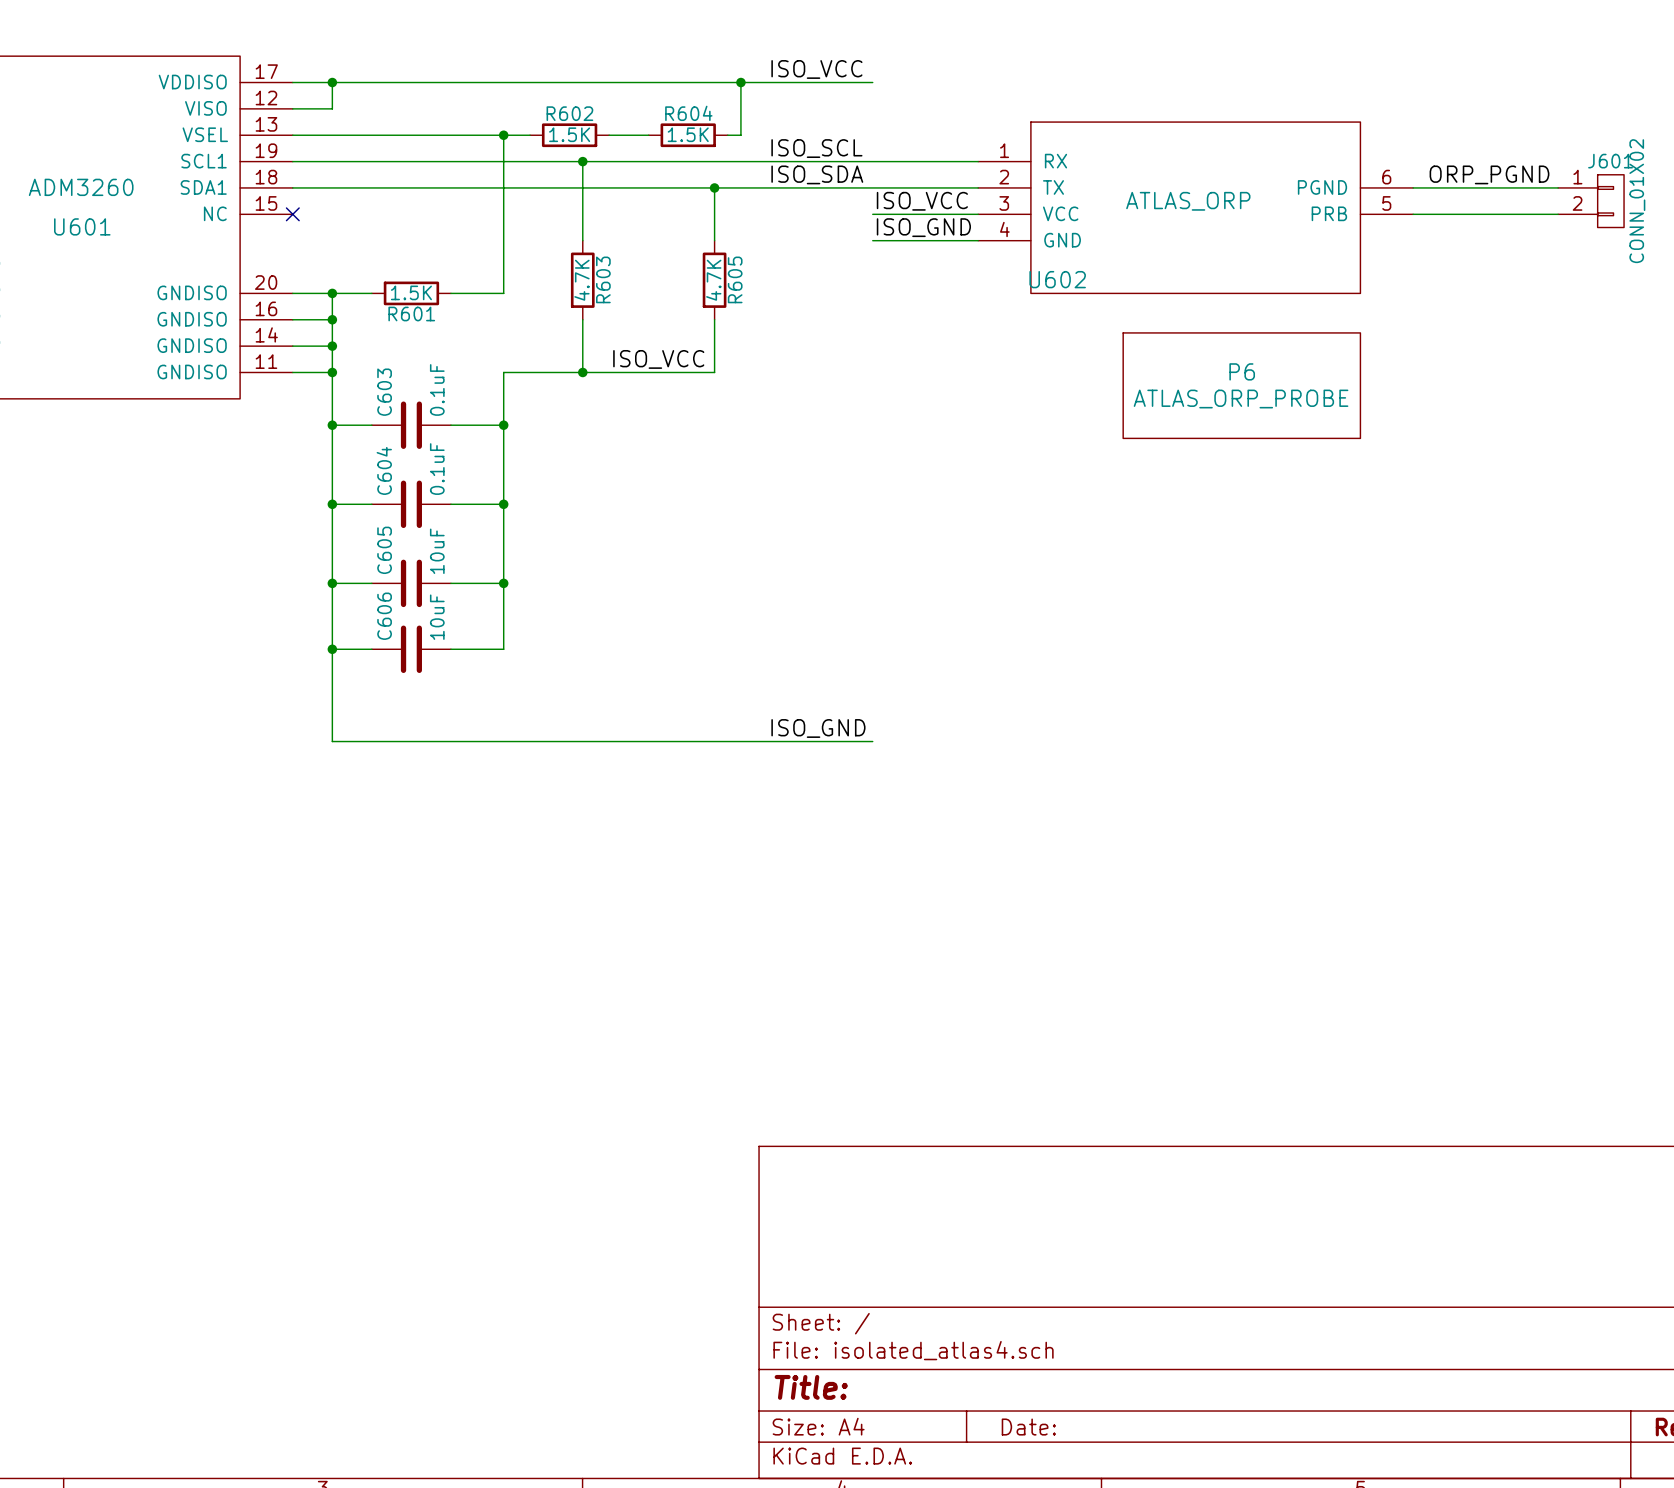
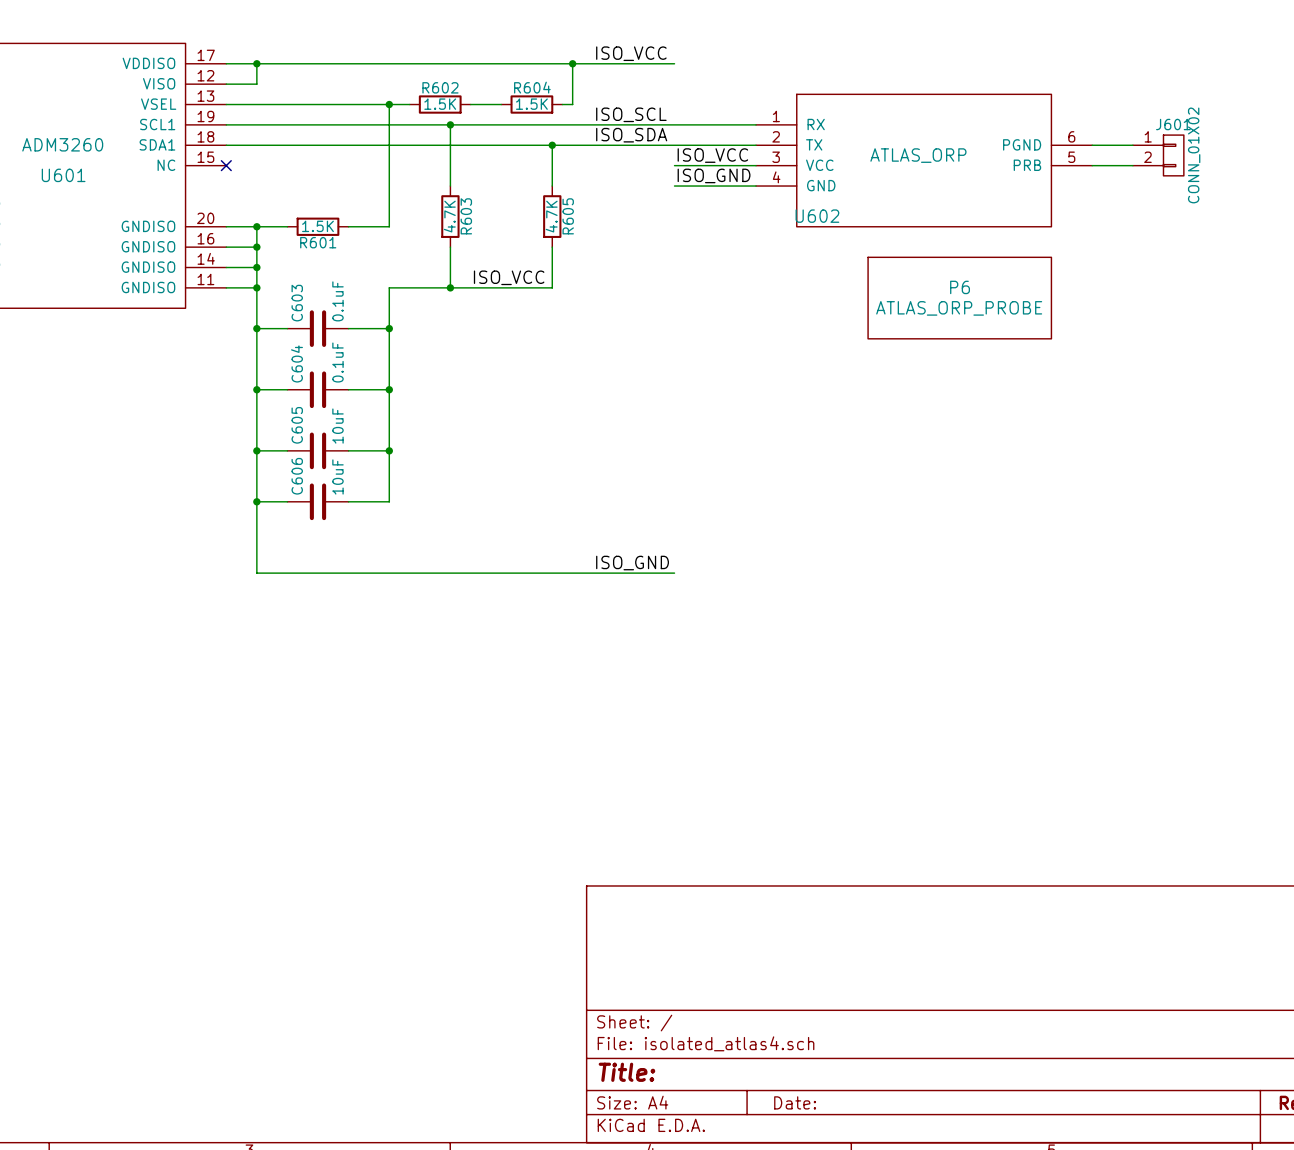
label: ORP_PGND (1489, 174) -> none
wire: (1465, 187) (1558, 187) -> none
J601 position: (1591, 201) -> (1158, 155)
wire: (1465, 214) (1558, 214) -> none

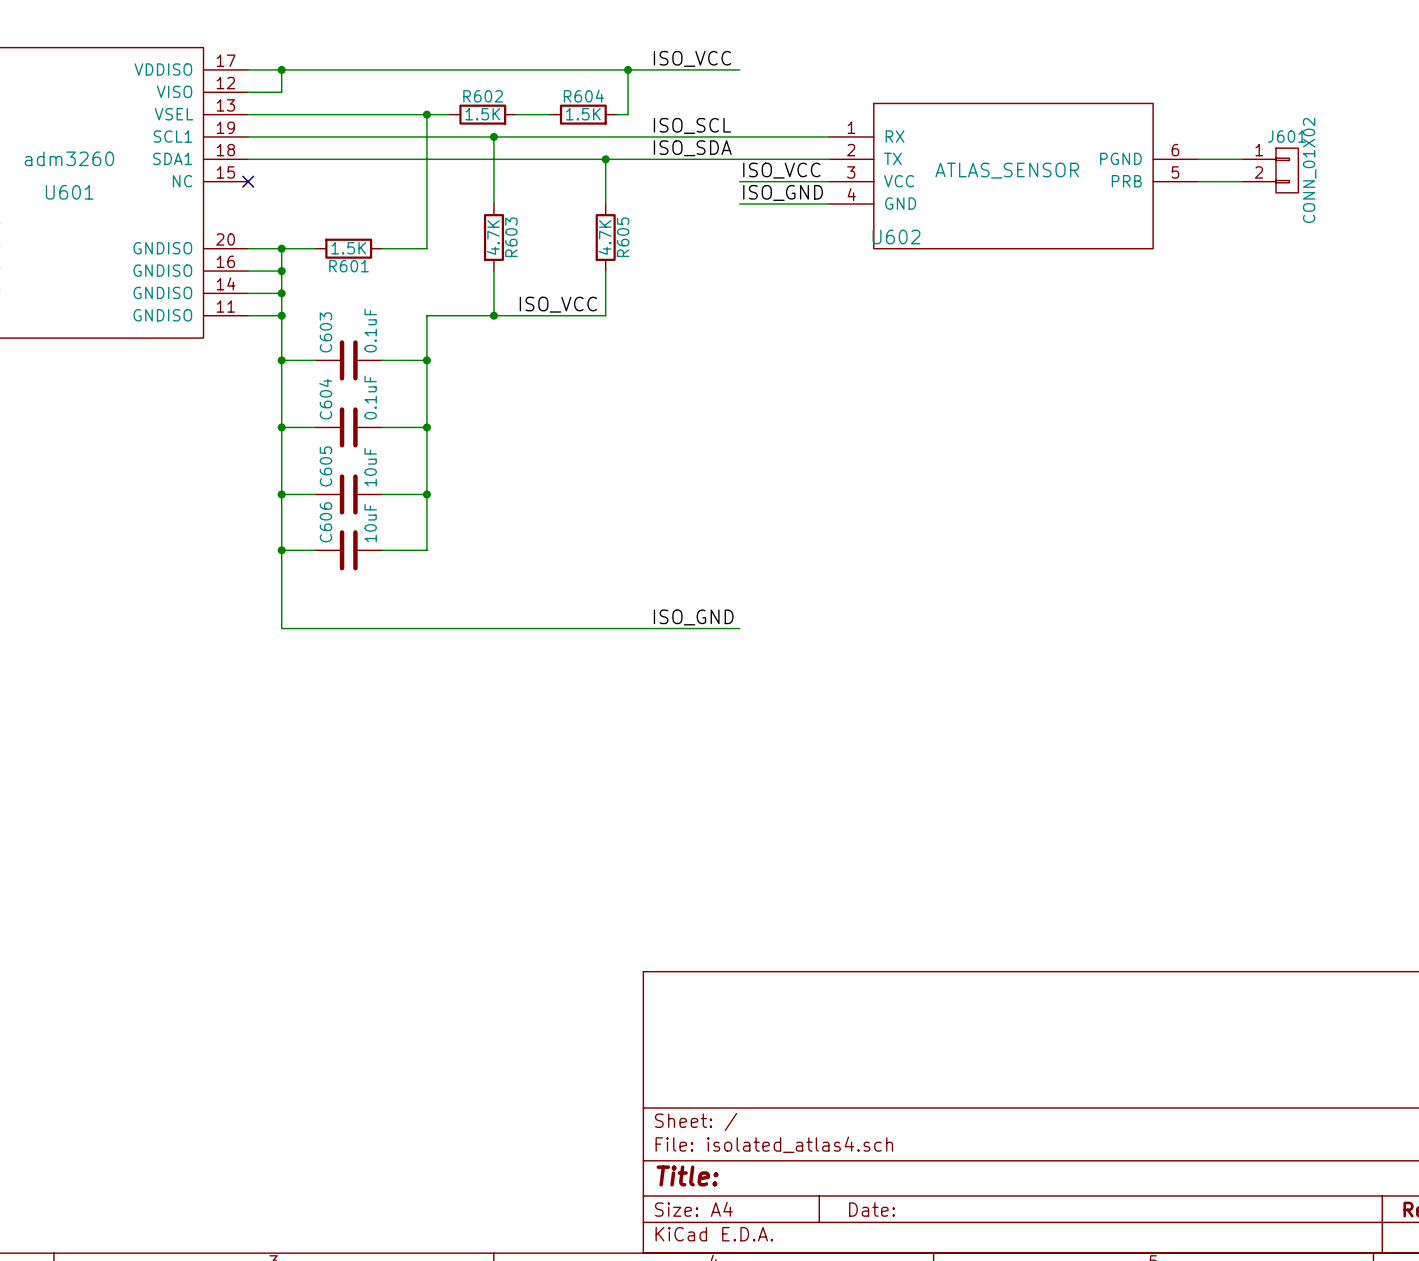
U601 value: ADM3260 (62, 144) -> adm3260 (69, 158)
U602 value: ATLAS_ORP (918, 155) -> ATLAS_SENSOR (1007, 170)
P6: ATLAS_ORP_PROBE (959, 298) -> none

